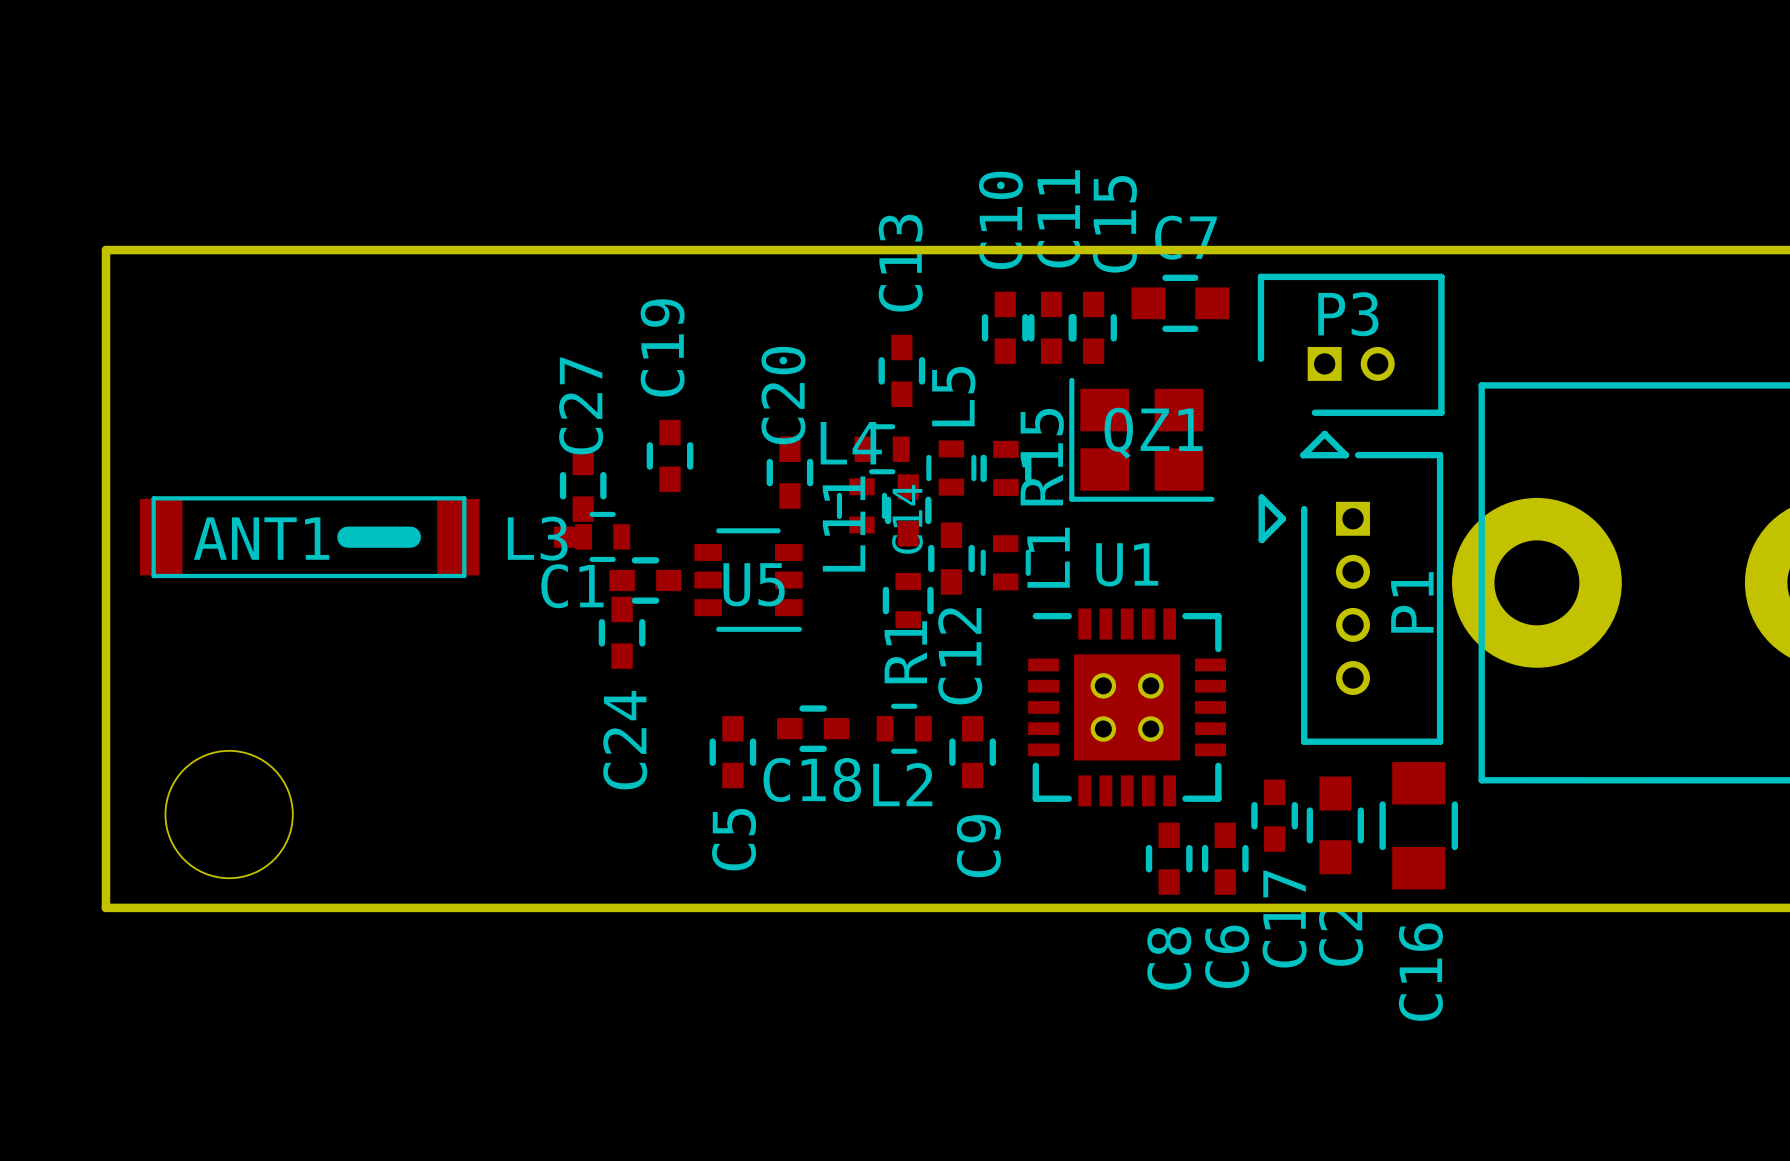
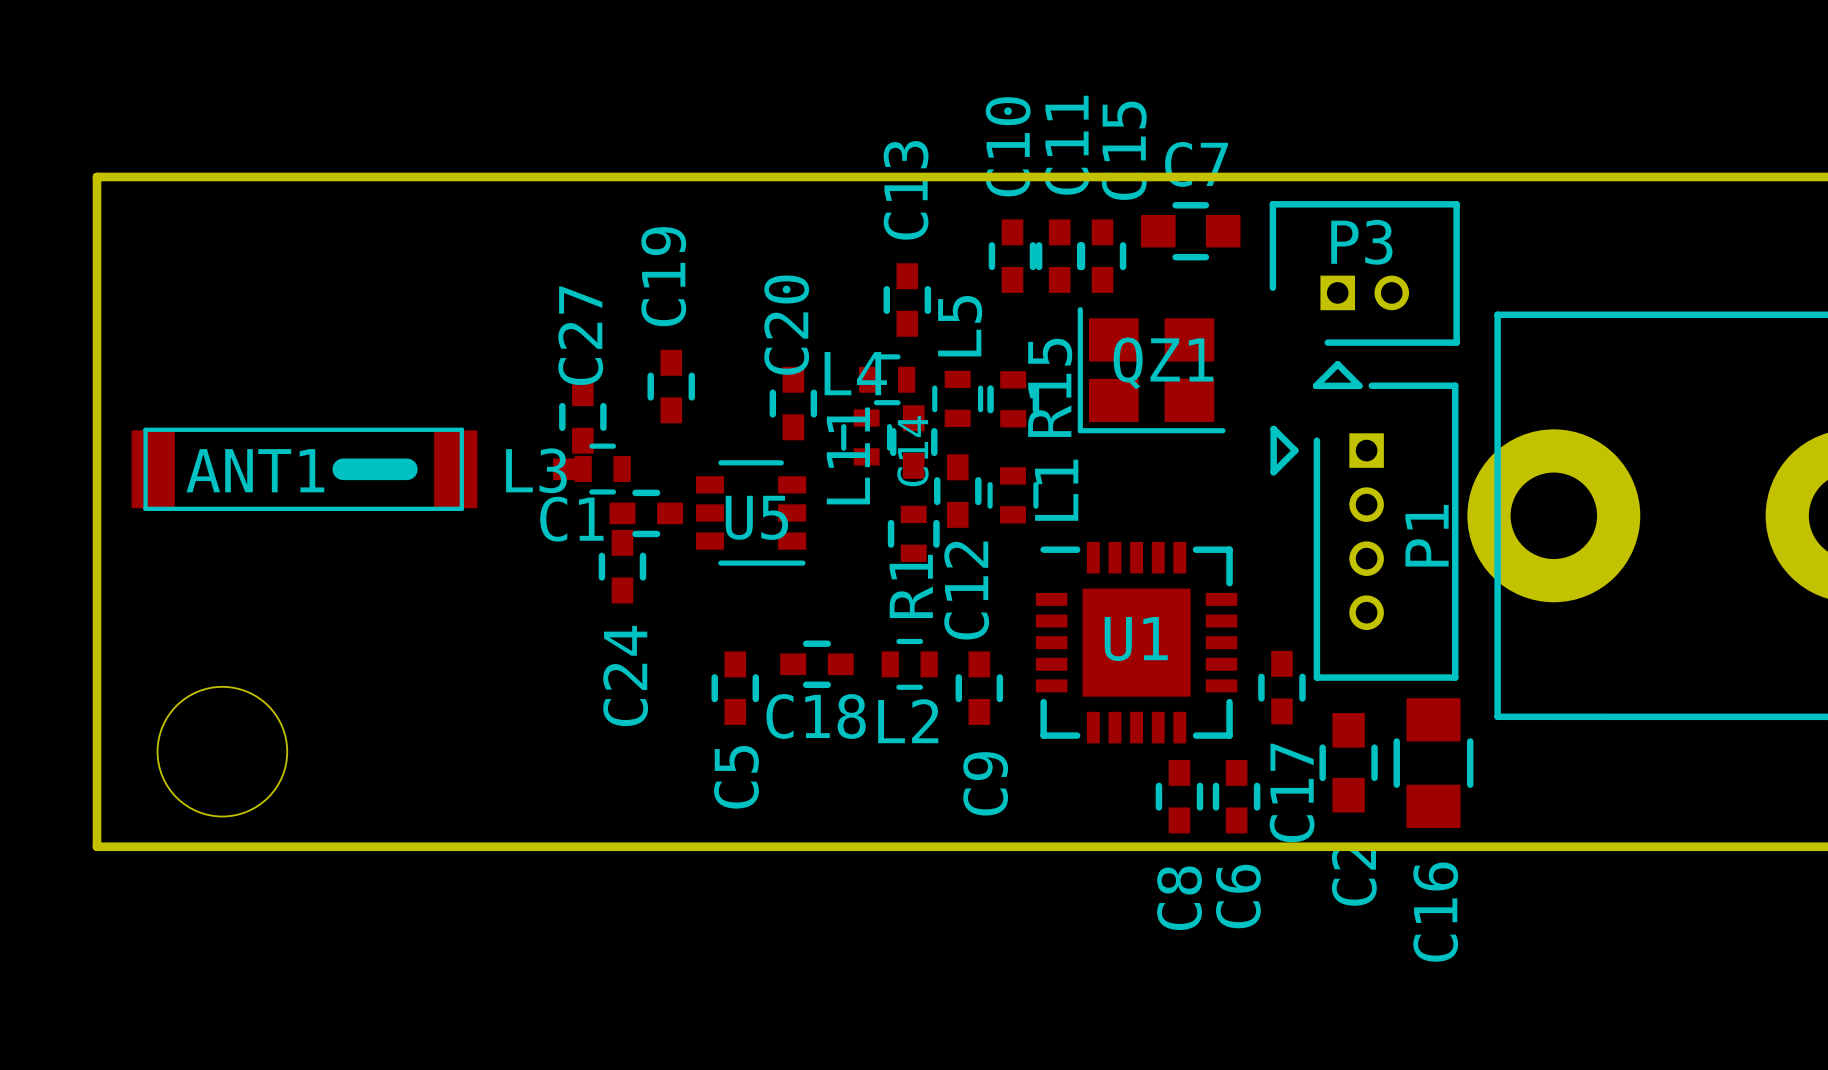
U1 name position: U1 (1127, 564) -> U1 (1136, 639)
U1 footprint: [1028, 608, 1227, 807] -> [1035, 541, 1238, 744]
C17 position: (1274, 815) -> (1281, 687)

